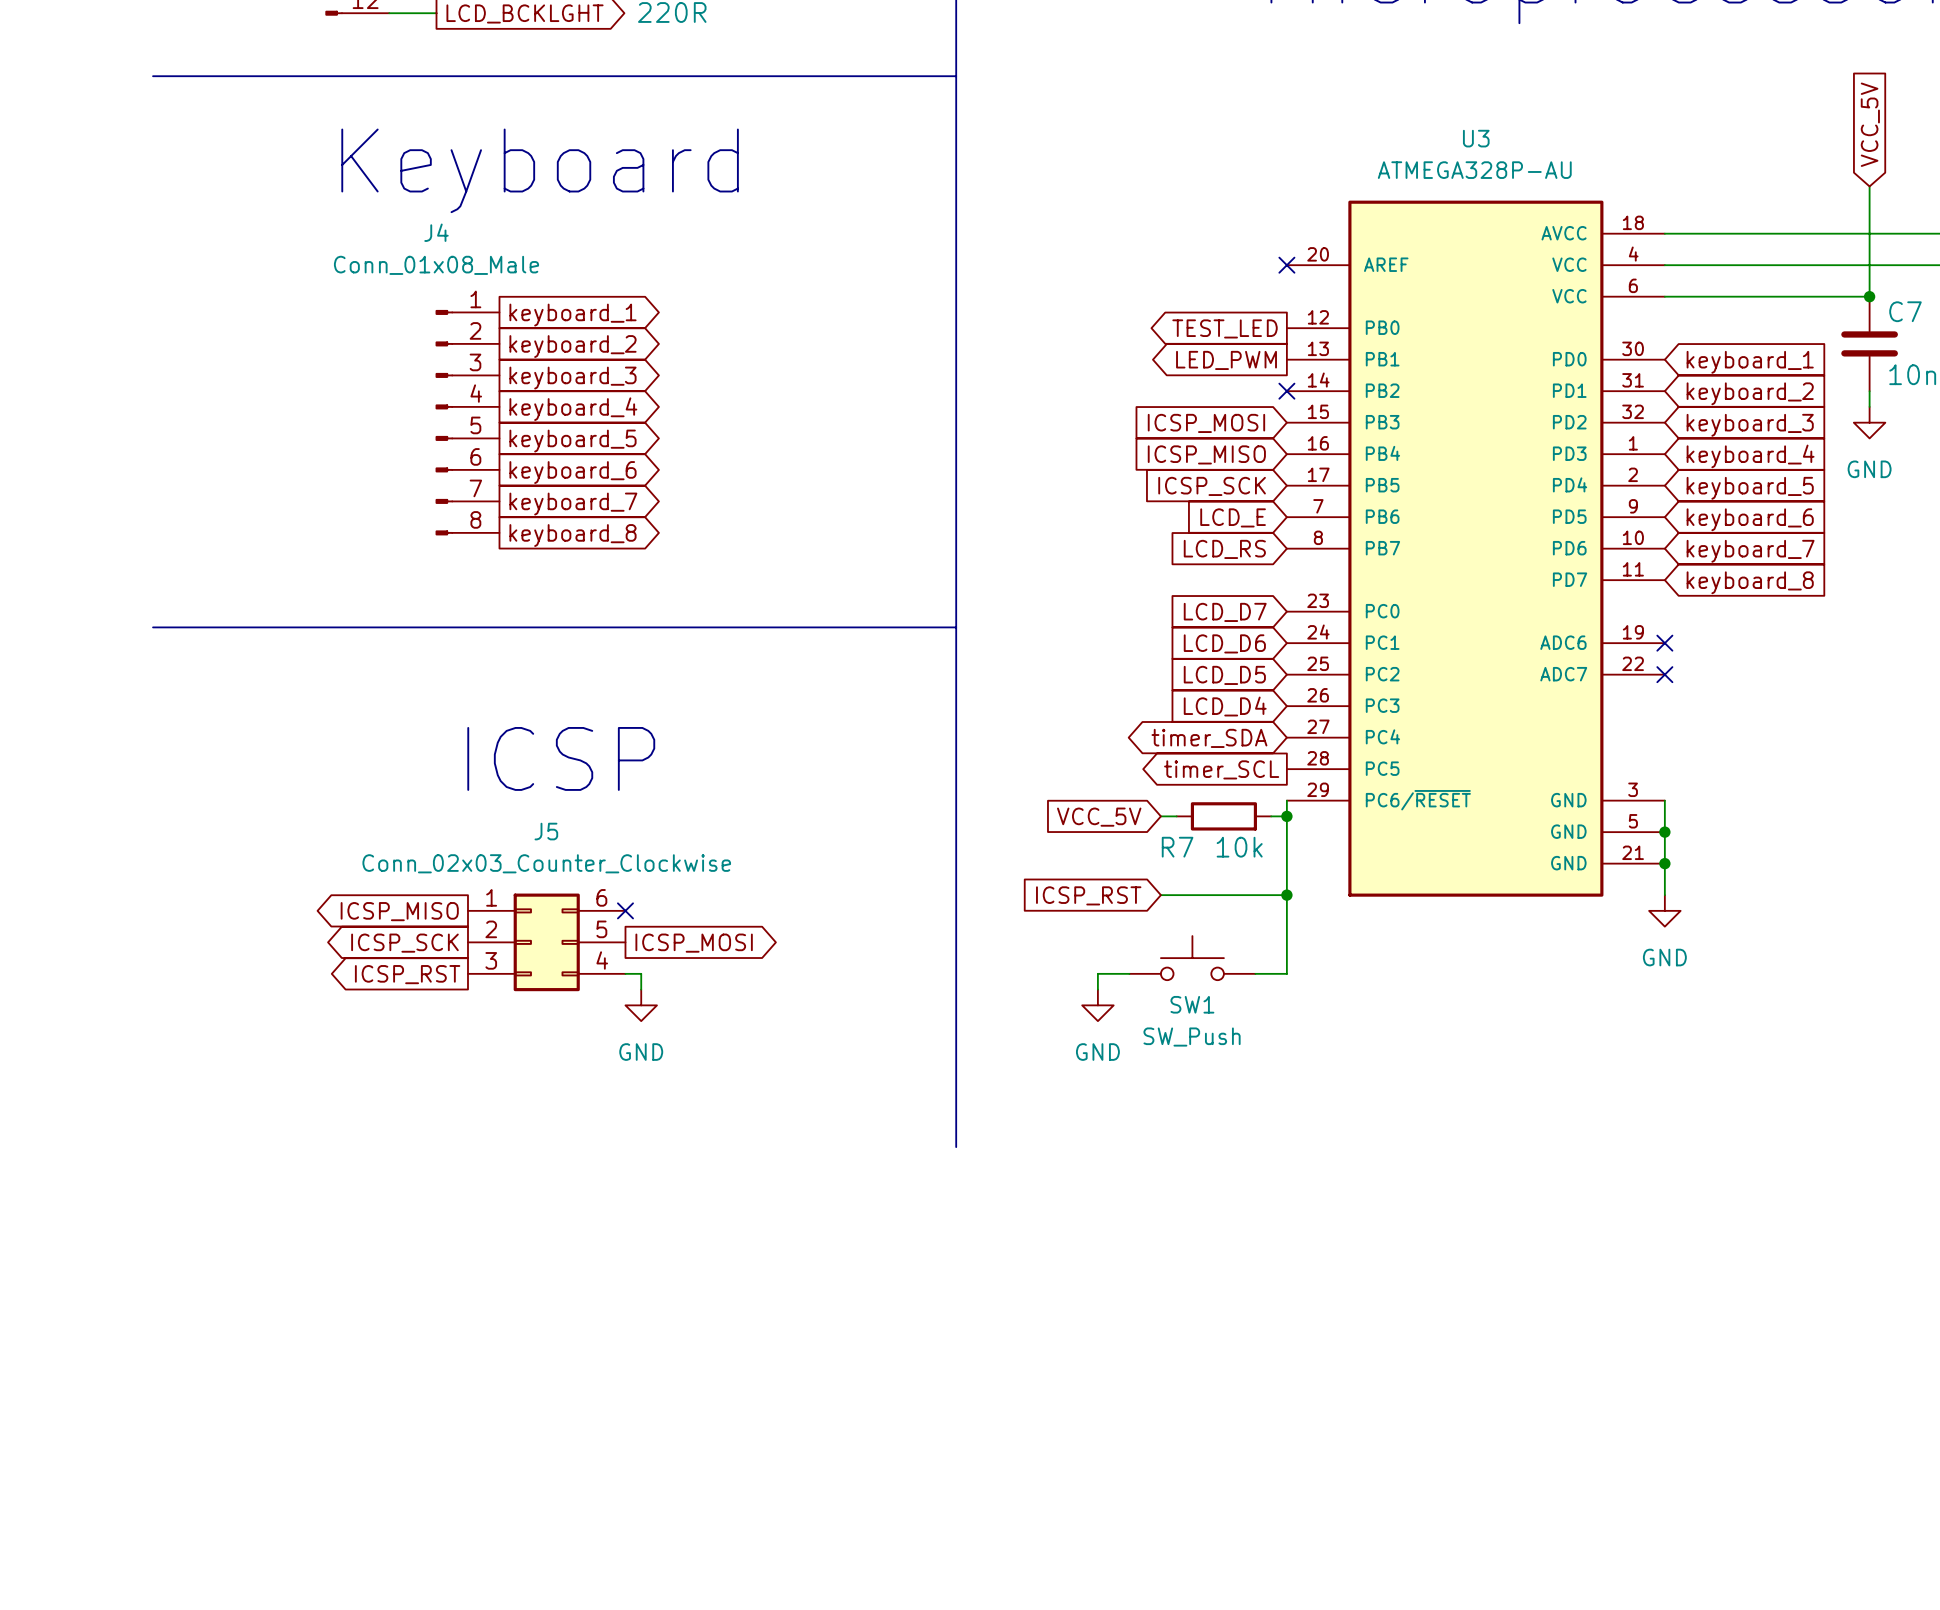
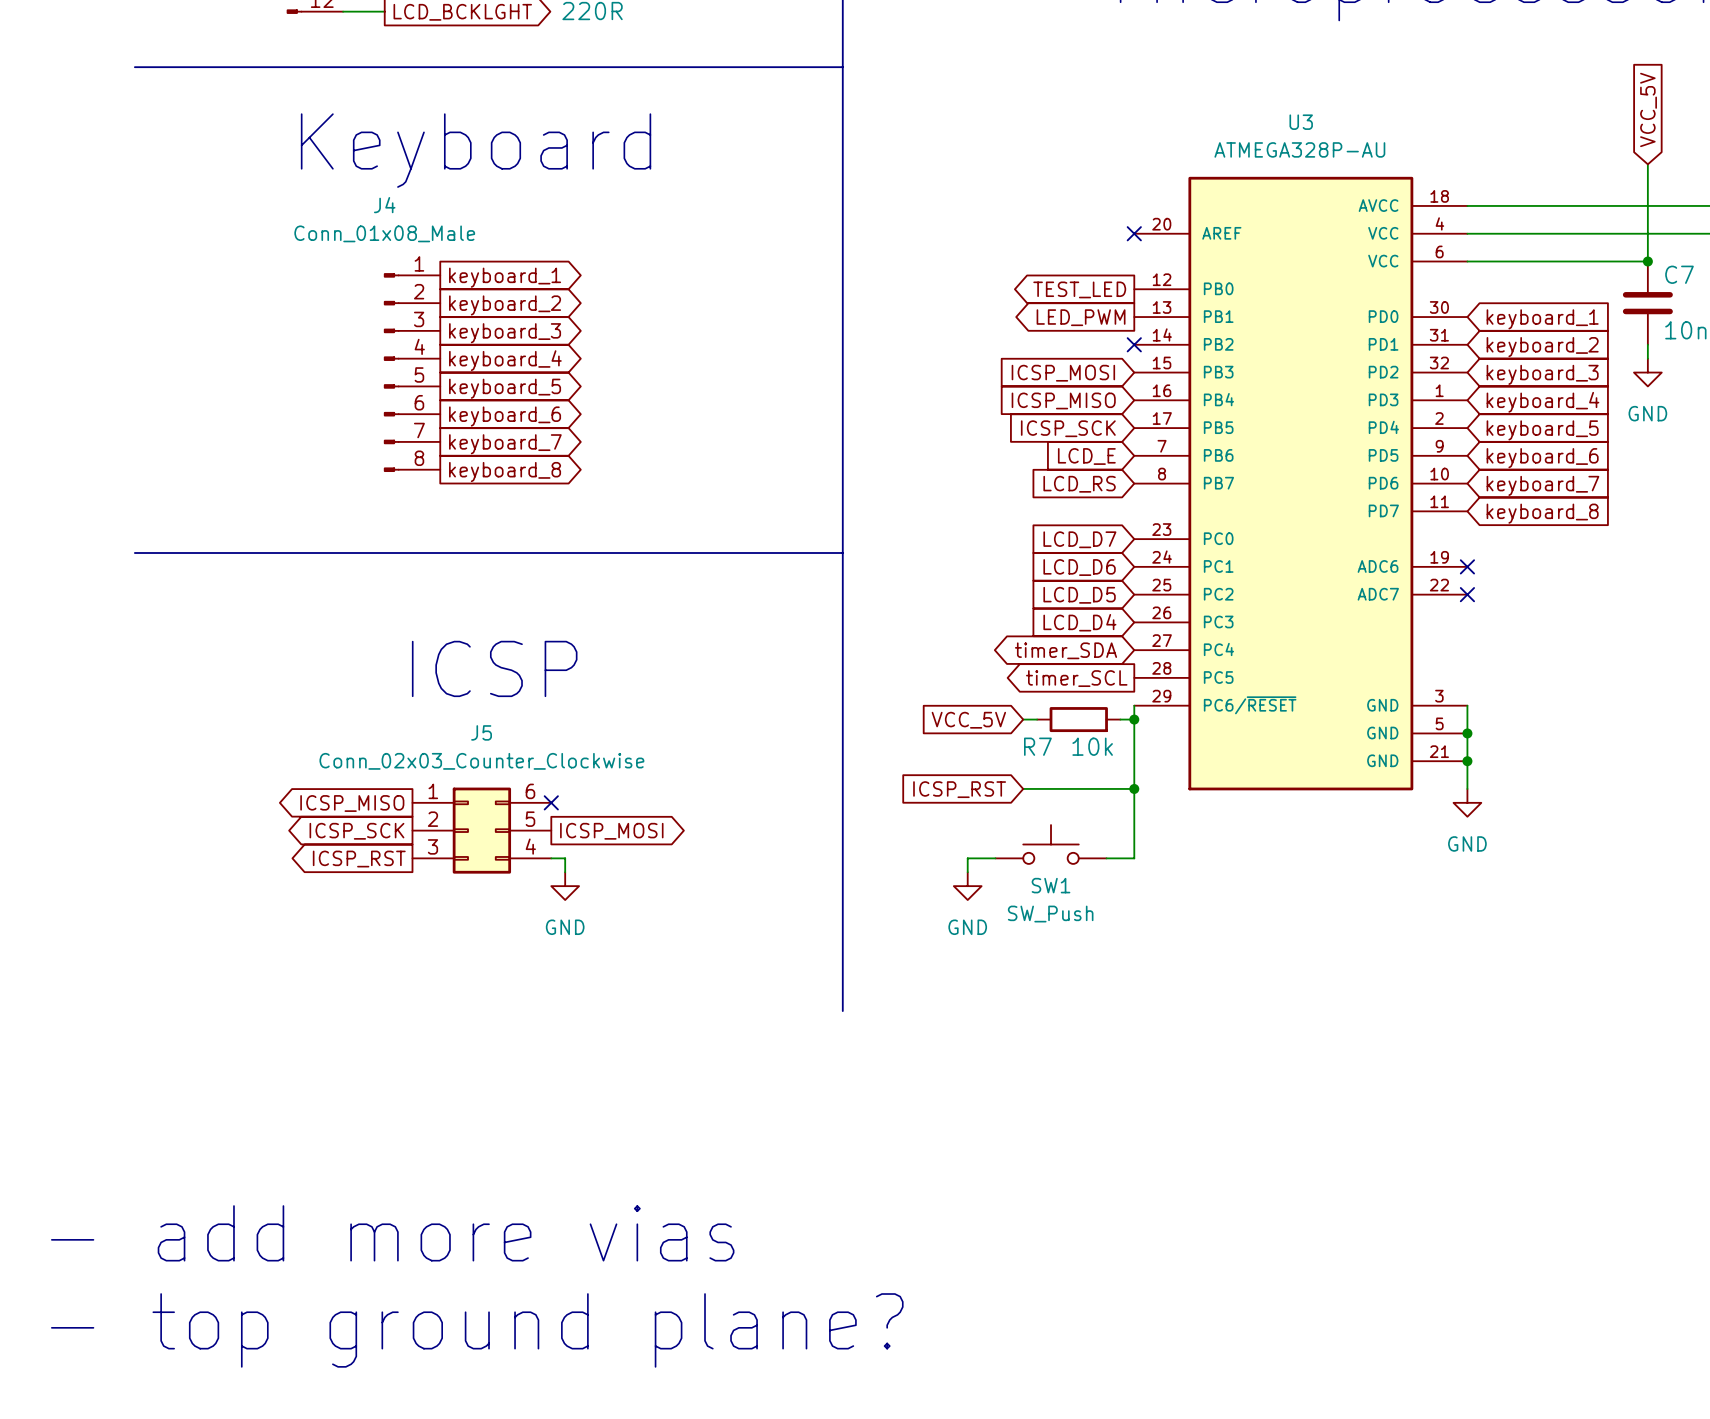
text: none -> - add more vias (392, 1233)
text: none -> - top ground plane? (477, 1330)

